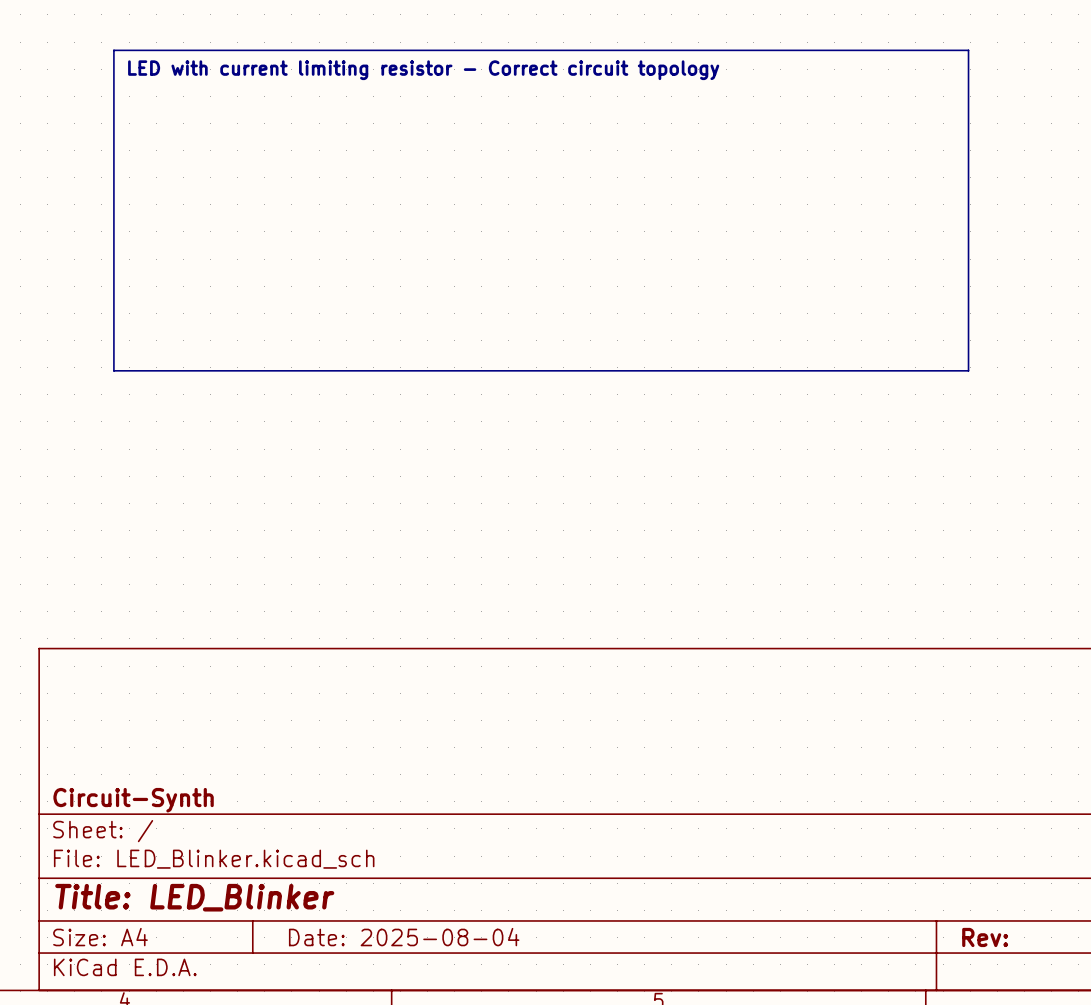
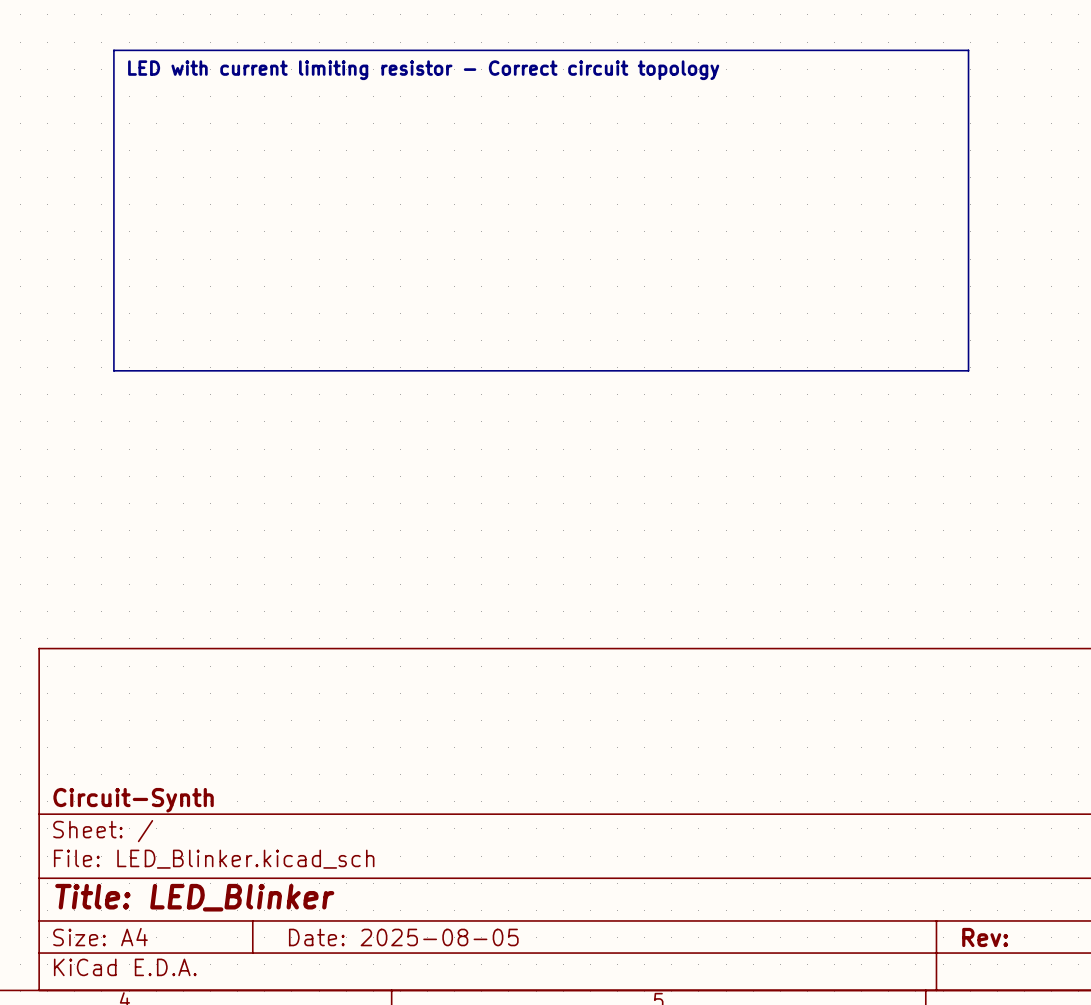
title block: Date: 2025-08-04 (404, 937) -> Date: 2025-08-05 (403, 937)

